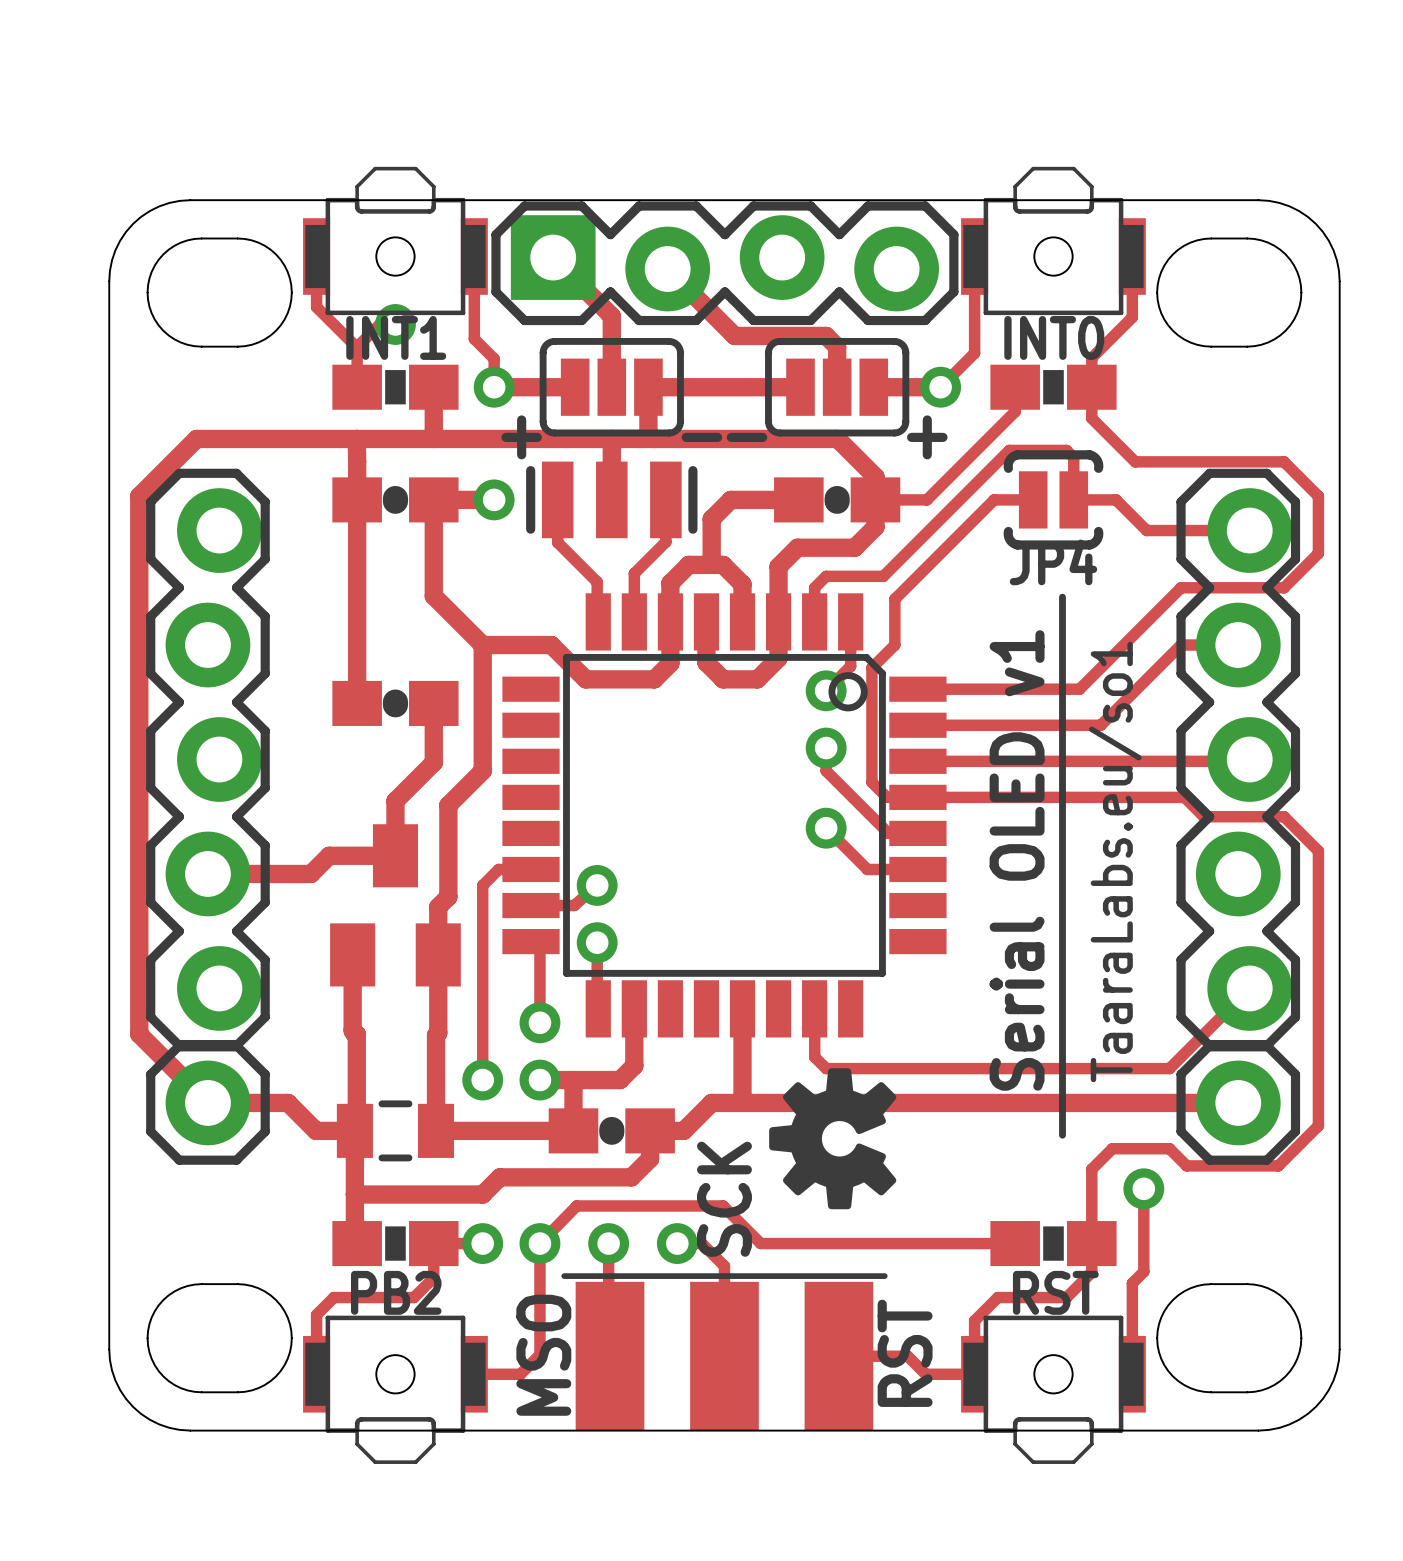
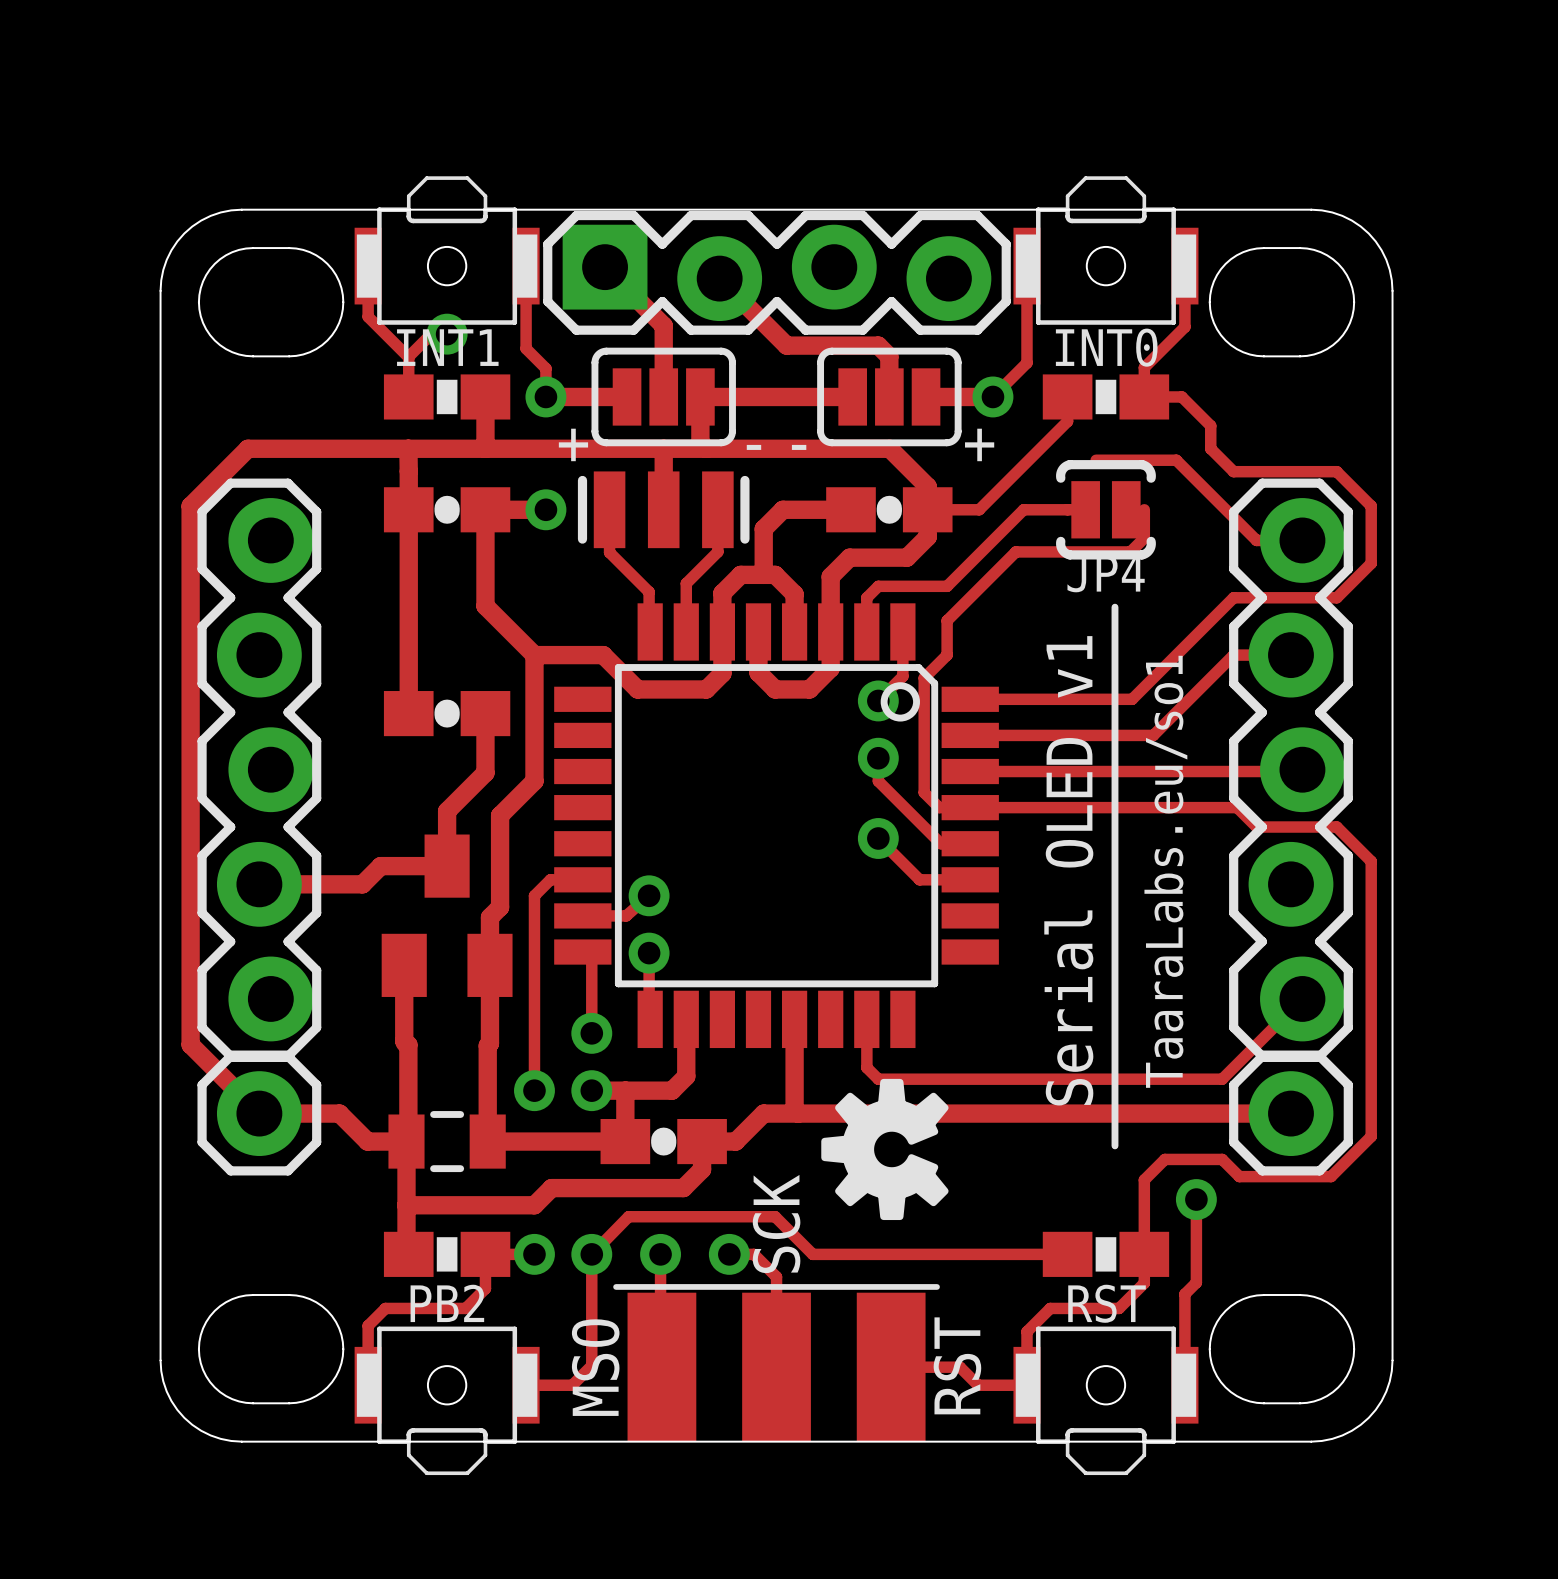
track: (1091, 387) (1091, 418) (1123, 450) -> (1144, 396) (1181, 396) (1210, 425) (1210, 448) (1233, 471)
track: (1043, 450) (1009, 450) (883, 576) -> none
track: (1066, 450) (1073, 457) (1073, 499) (1116, 499) (1146, 530) (1203, 530) -> (1187, 471) (1256, 540)
track: none -> (1119, 460) (1176, 460)
track: (1135, 461) (1181, 461) -> none
track: (994, 499) (894, 599) (894, 610) -> (1046, 509) (1023, 509) (947, 586) (935, 586)
track: none -> (1144, 509) (1144, 538) (1130, 551) (1015, 551) (947, 620)

